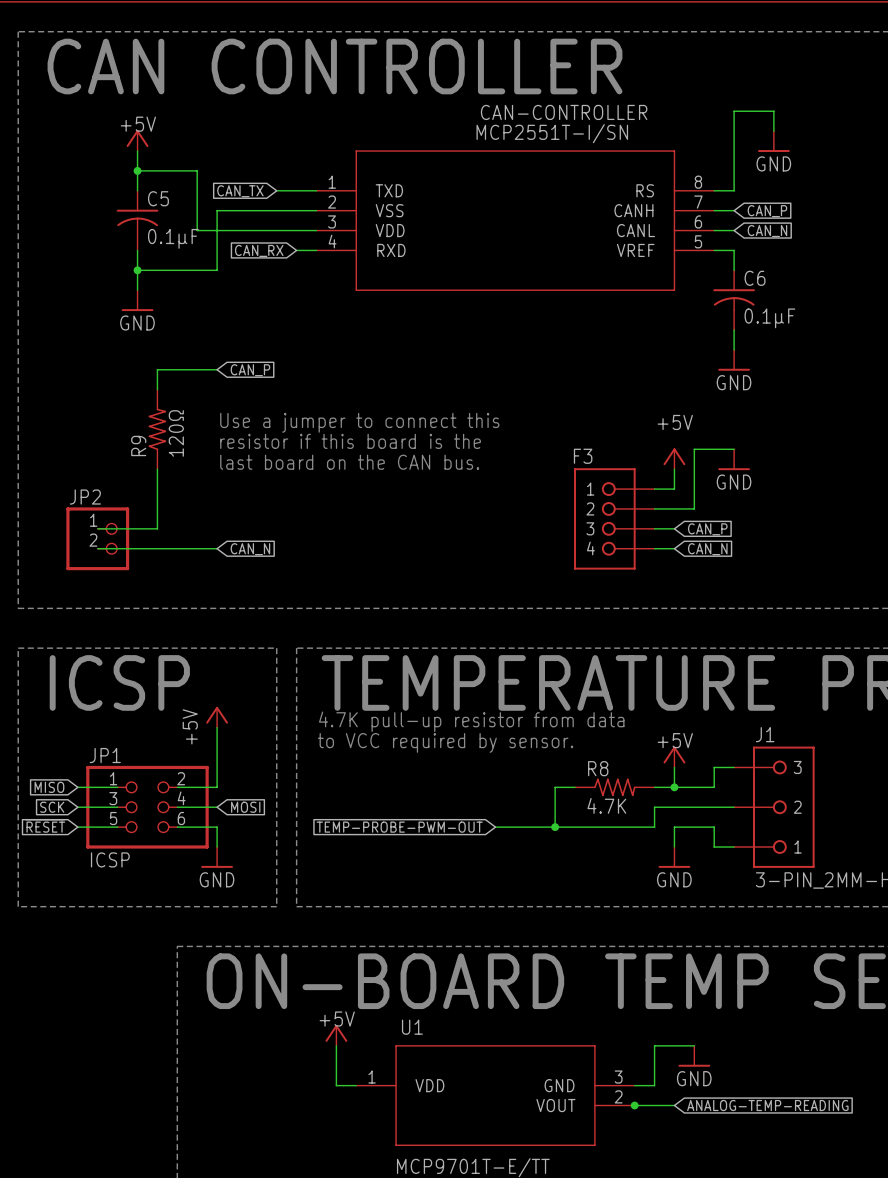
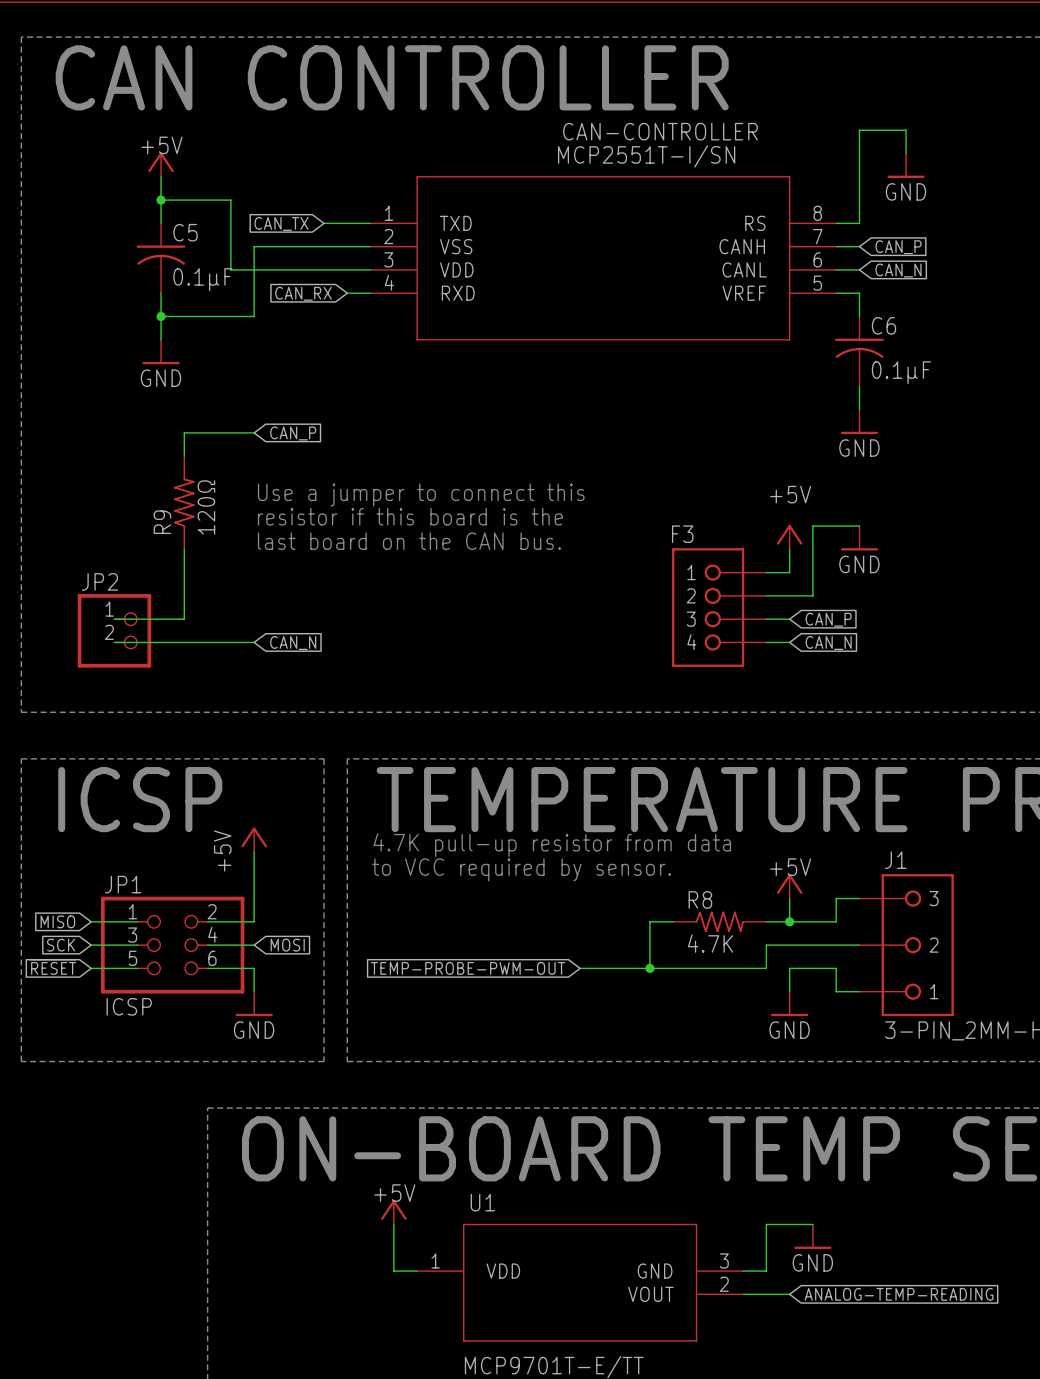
junction: (634, 1105) -> none

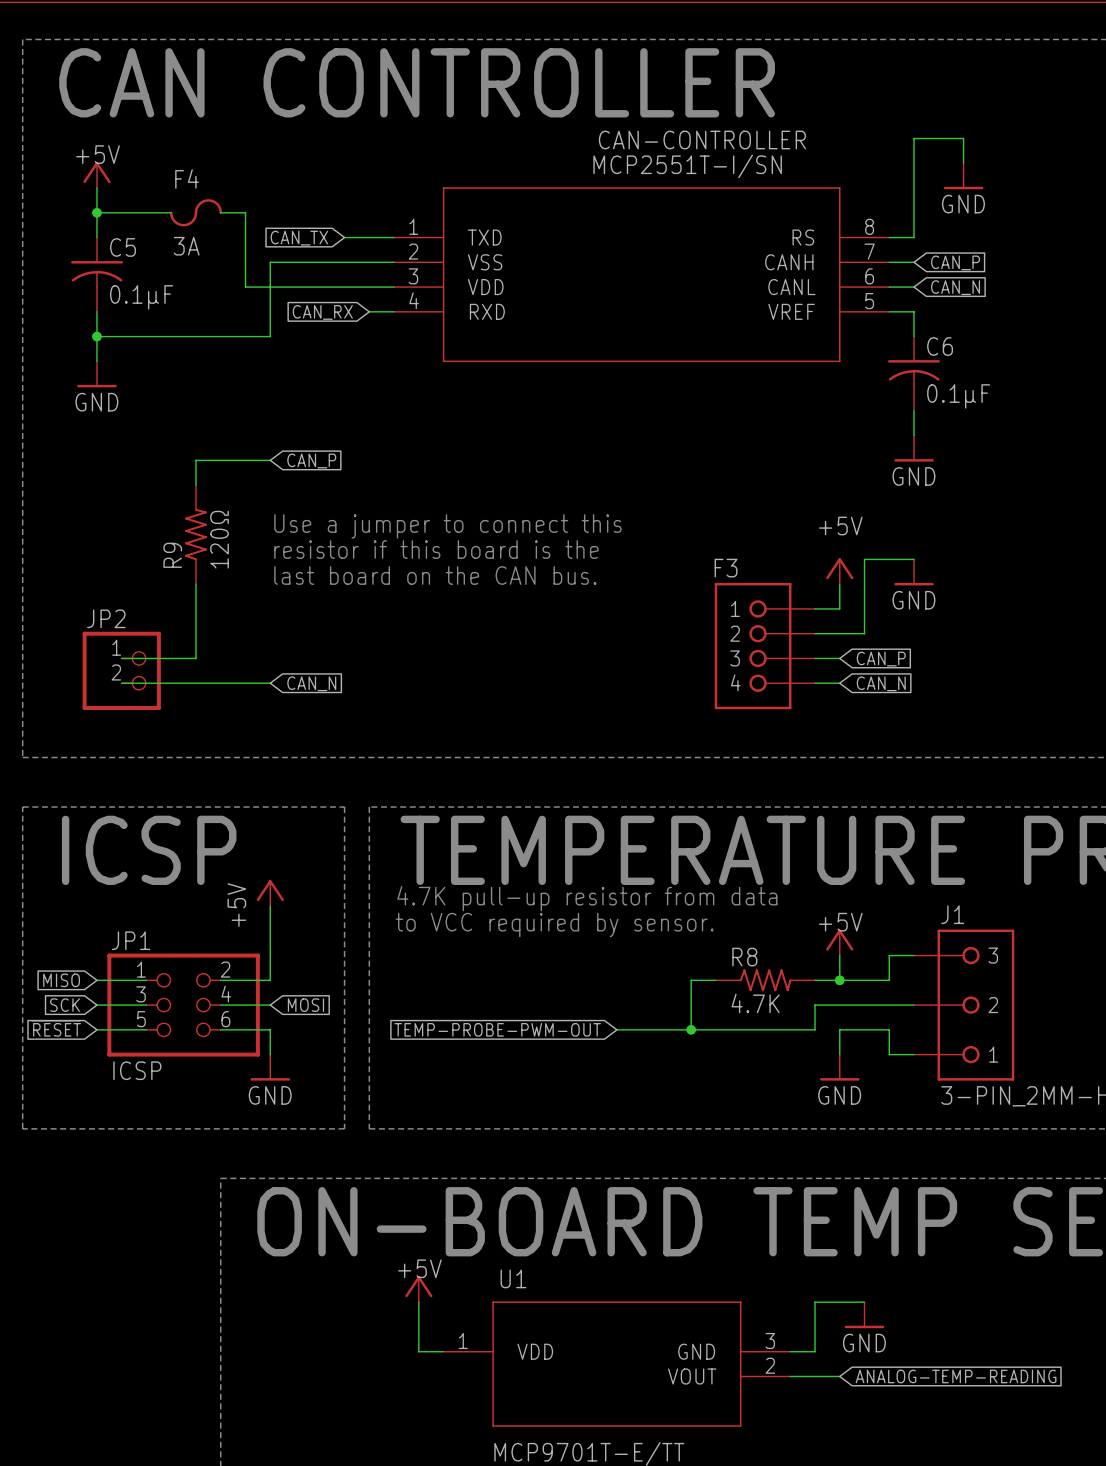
power symbol position: +5V (161, 164) -> +5V (96, 175)
wire: (161, 176) (161, 223) -> (96, 188) (96, 237)
junction: none -> (96, 212)
wire: (161, 200) (207, 200) -> (171, 212) (96, 212)
junction: (161, 200) -> none
F4: none -> 3A (196, 212)
C5 position: (161, 258) -> (96, 274)
wire: (161, 293) (161, 339) -> (96, 311) (96, 361)
wire: none -> (96, 336) (171, 336)
junction: none -> (96, 336)
junction: (161, 316) -> none
power symbol position: GND (161, 352) -> GND (96, 374)

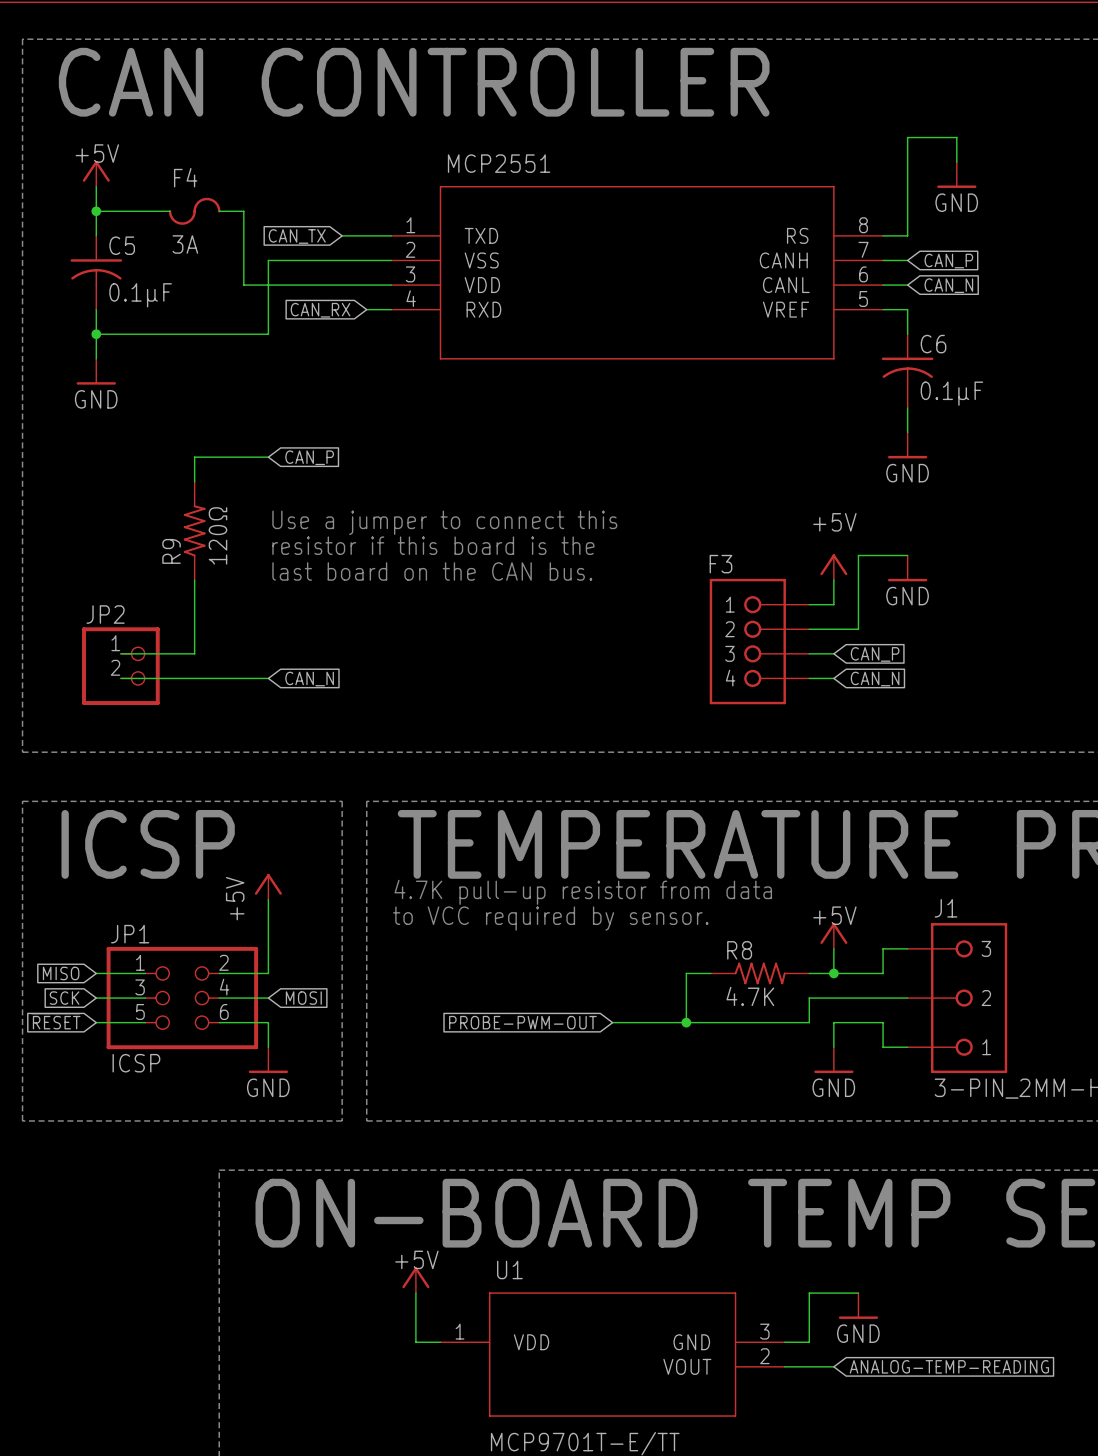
CAN-CONTROLLER name: CAN-CONTROLLER (702, 140) -> MCP2551 (499, 163)
CAN-CONTROLLER value: MCP2551T-I/SN (687, 166) -> none
global label: TEMP-PROBE-PWM-OUT (497, 1029) -> PROBE-PWM-OUT (522, 1022)

